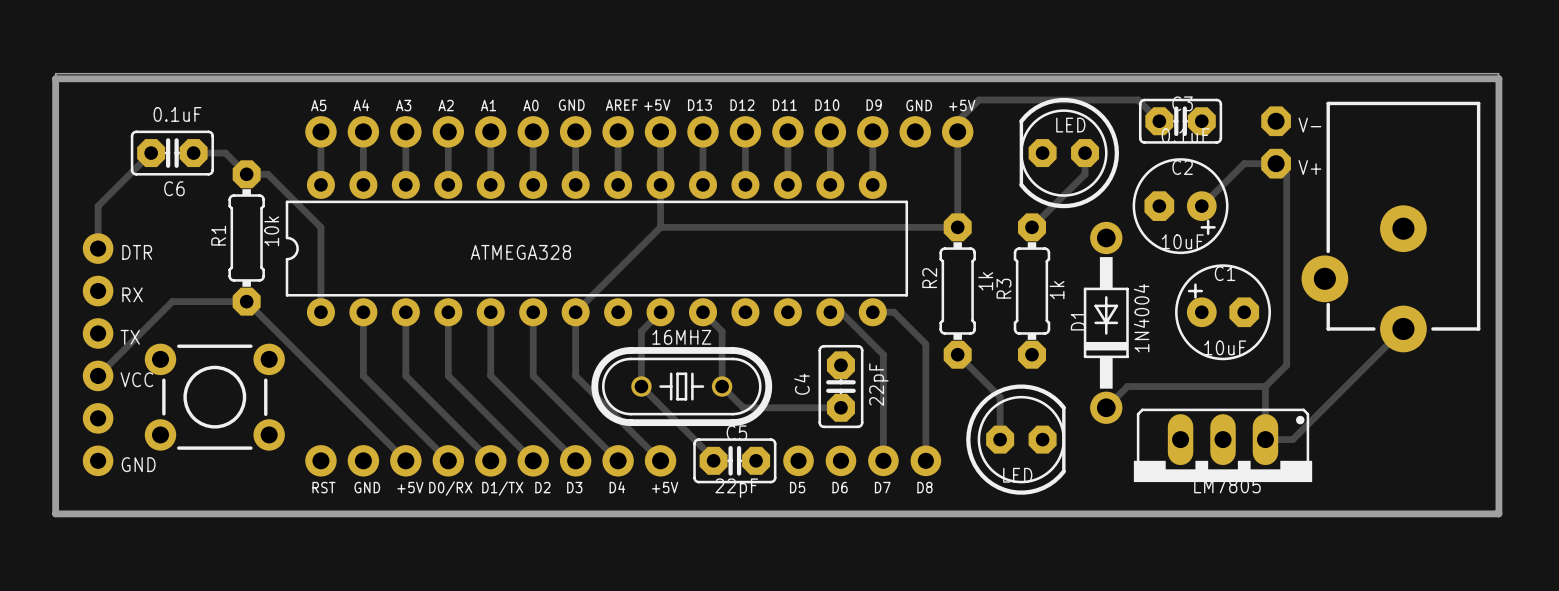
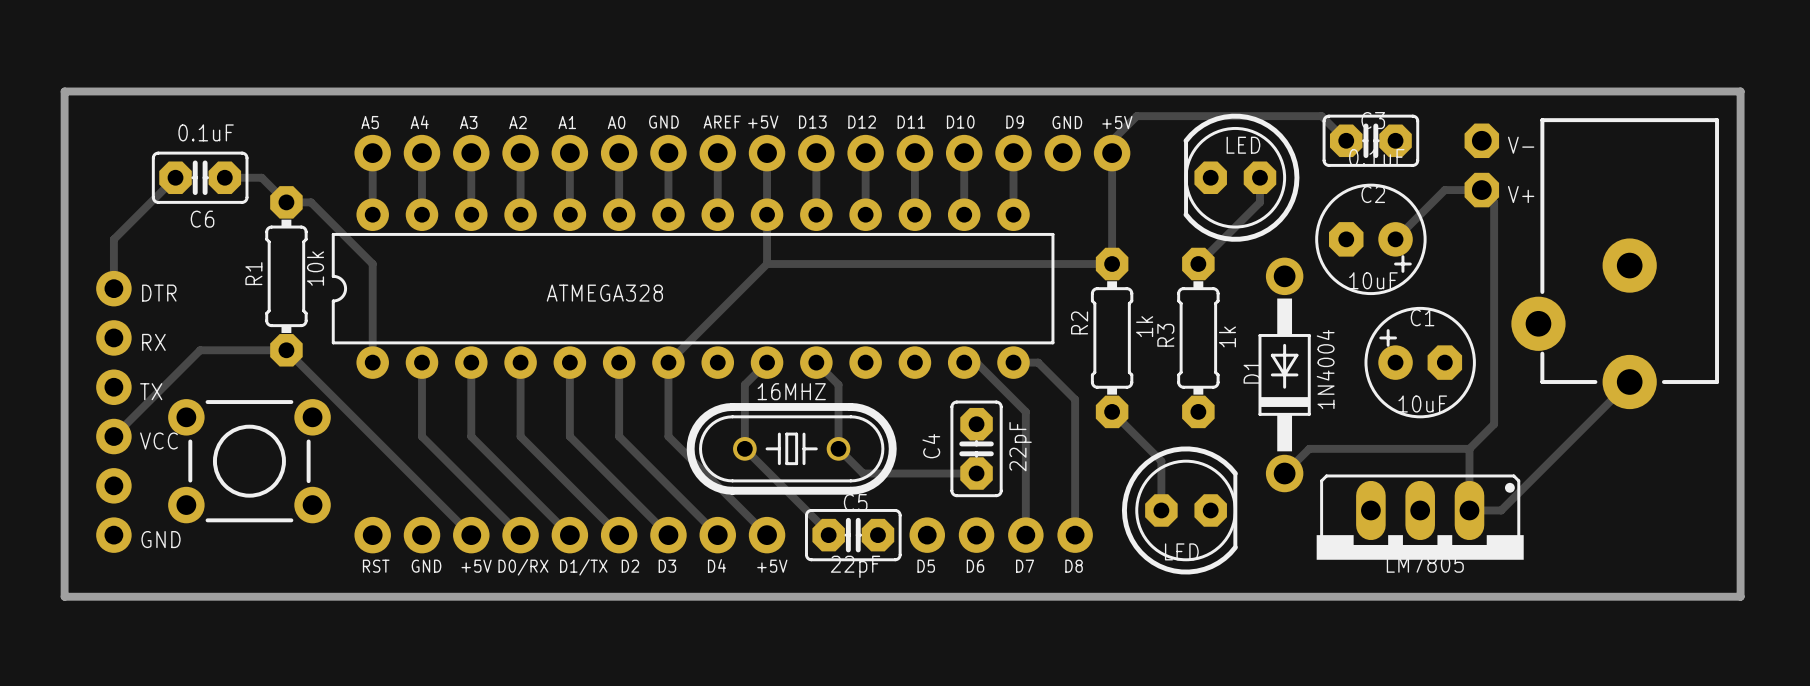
board edge: (55, 78) (55, 73) (1498, 73) (1498, 513) -> none

